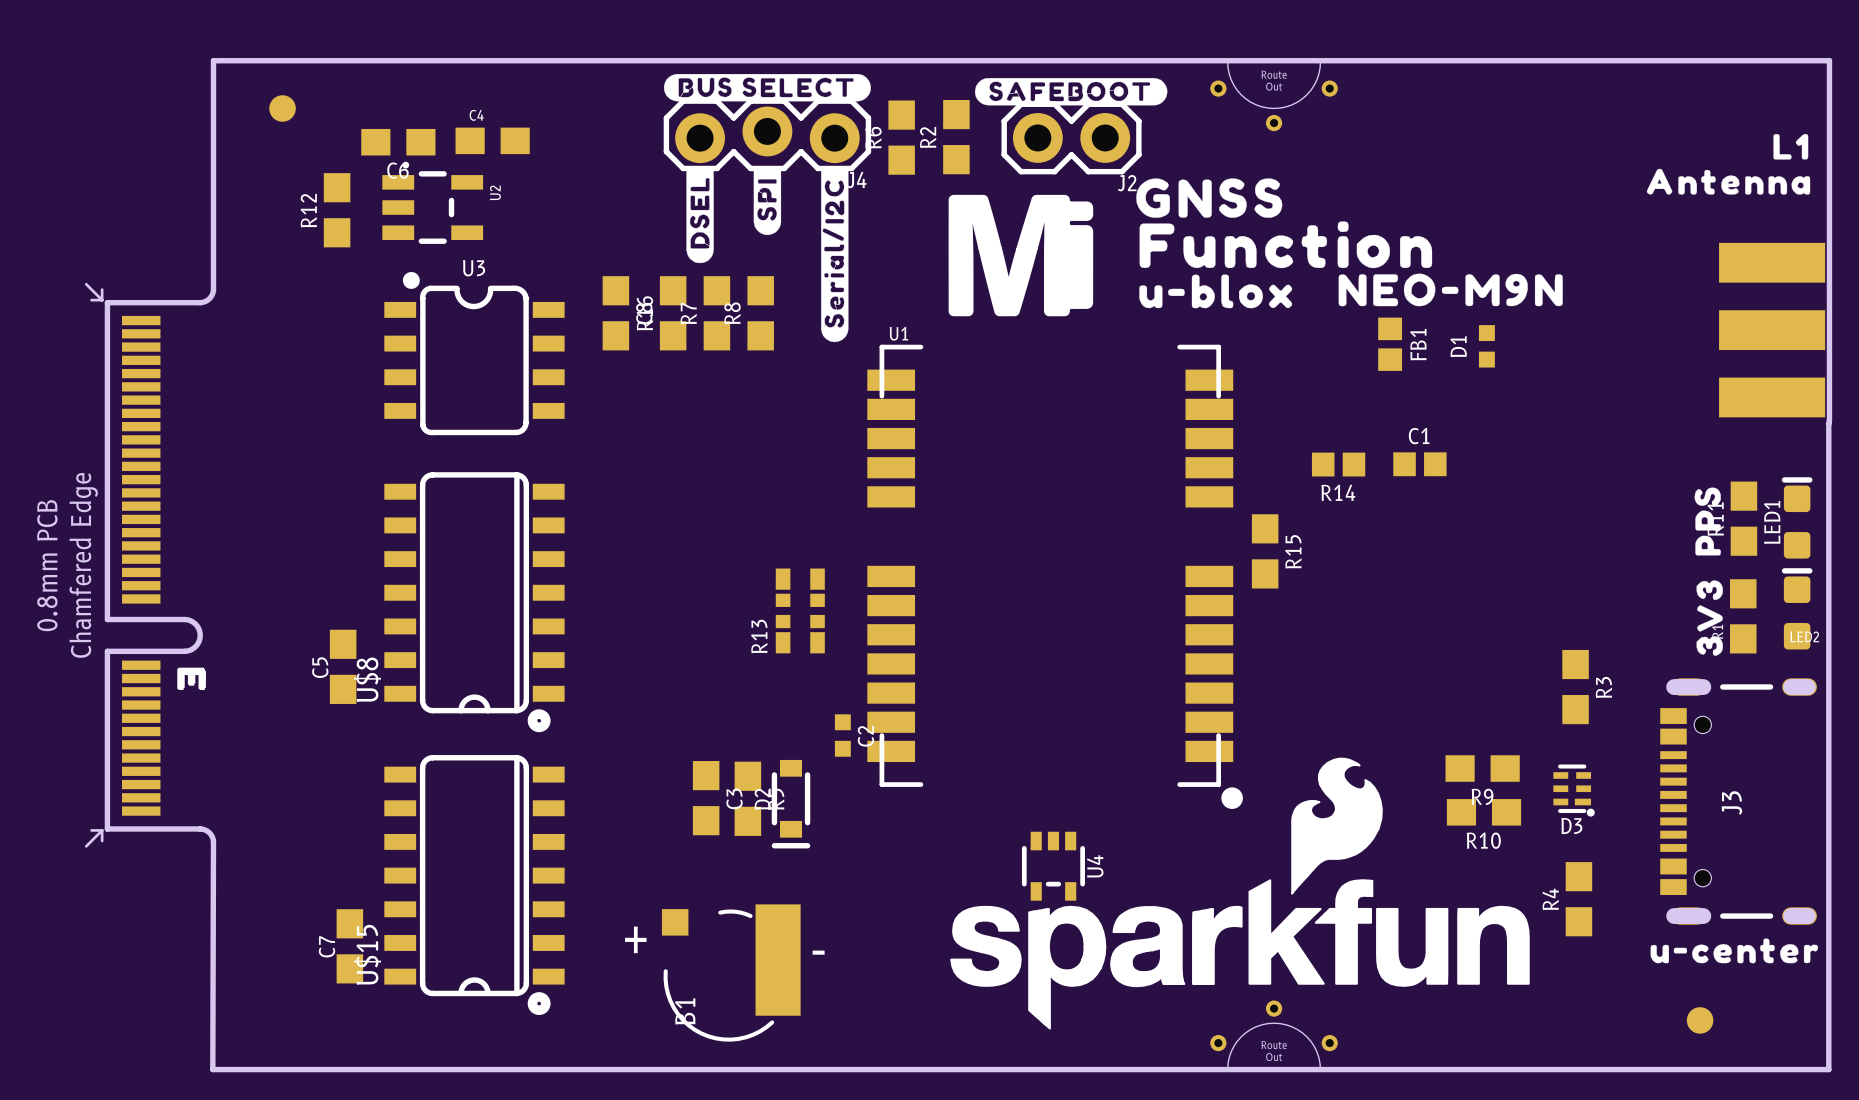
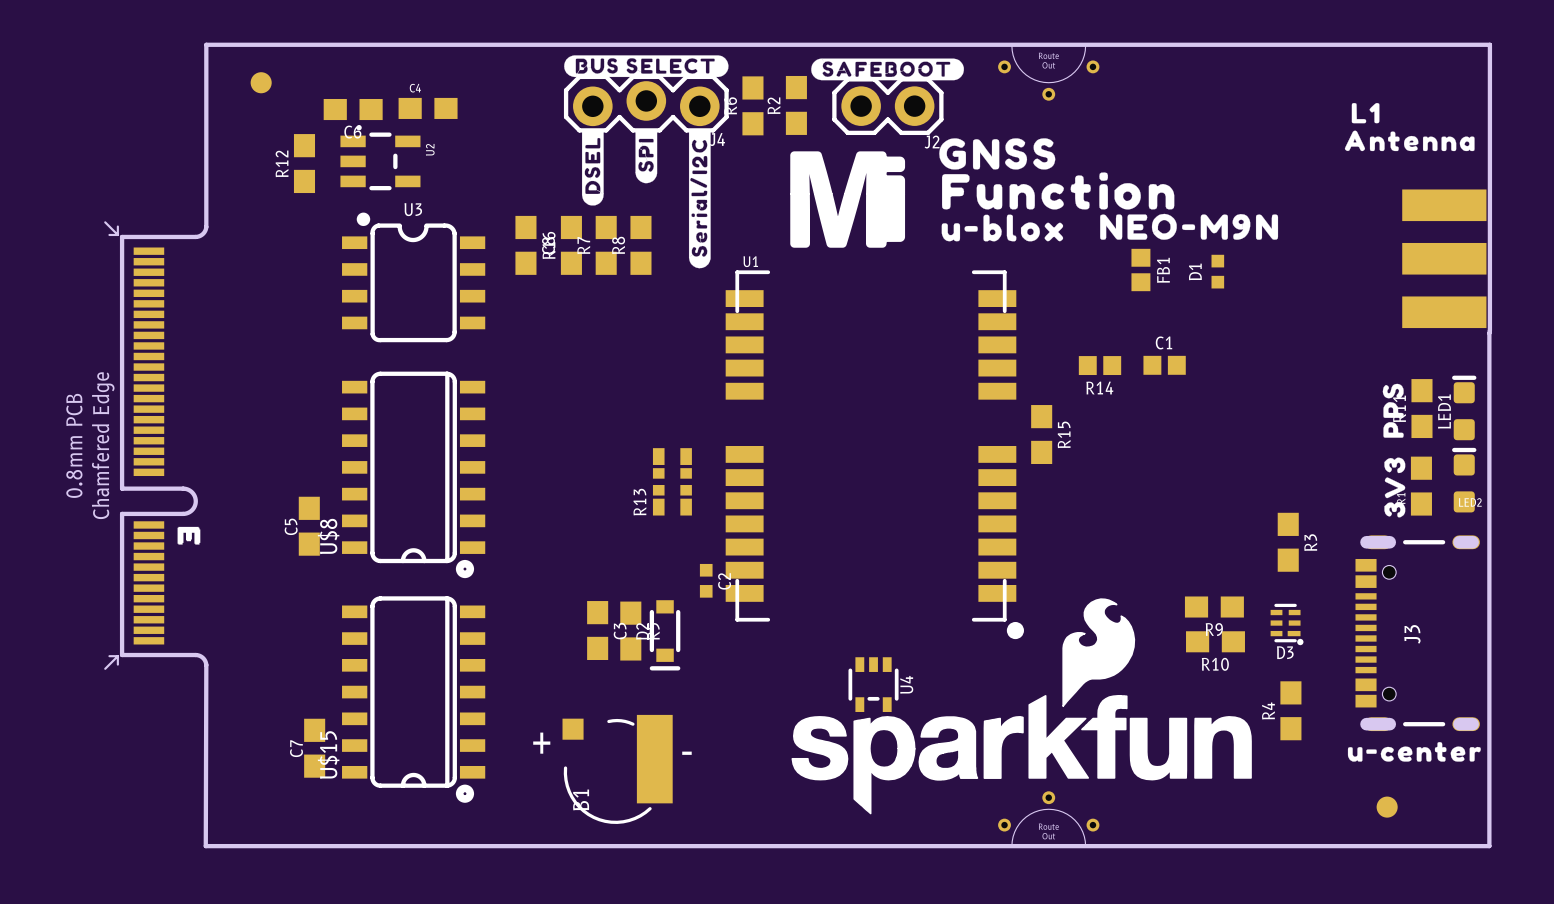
drawing position: (1790, 146) -> (1365, 113)

